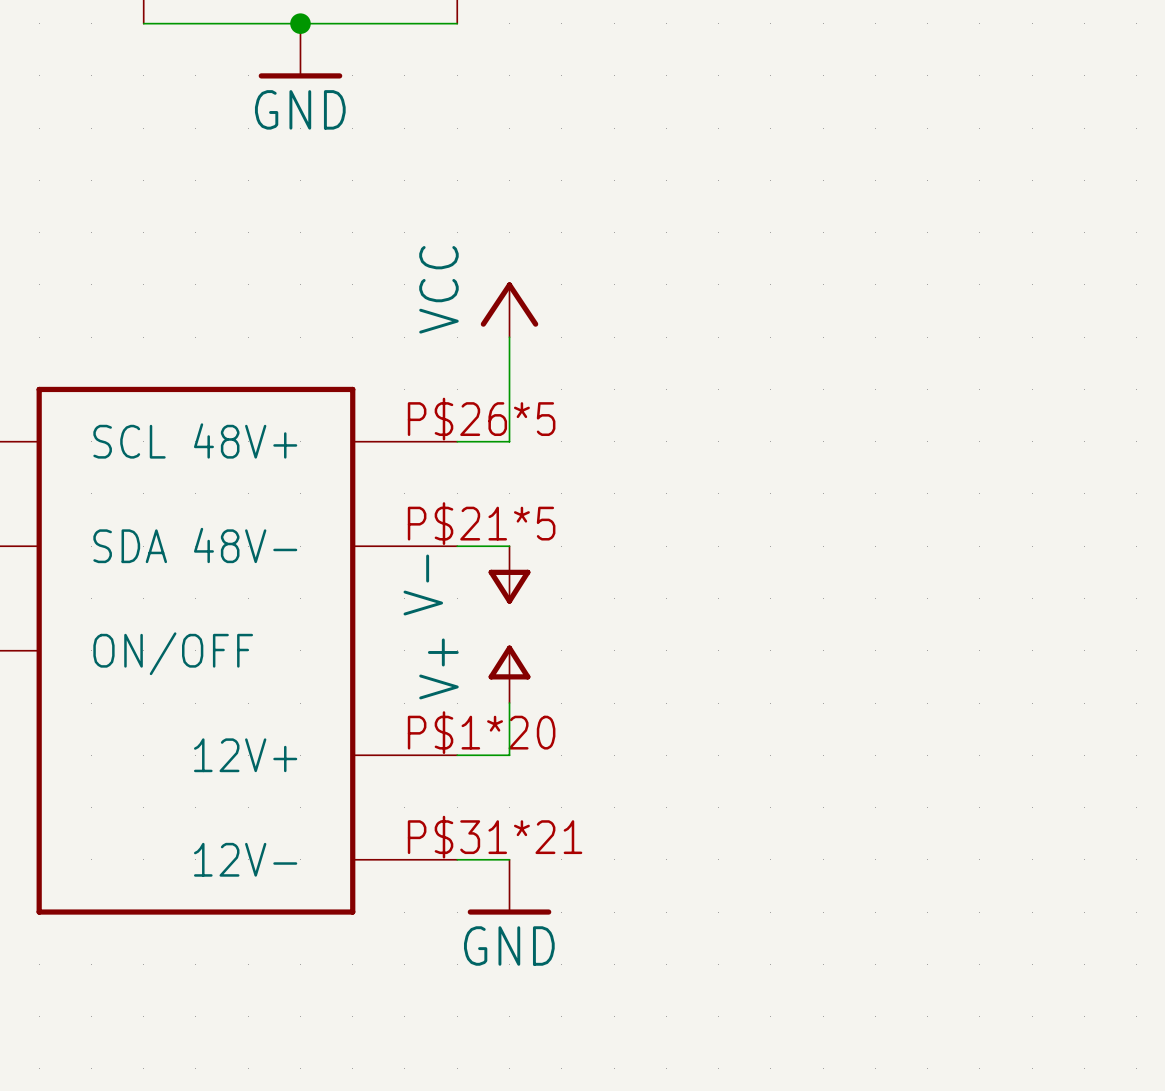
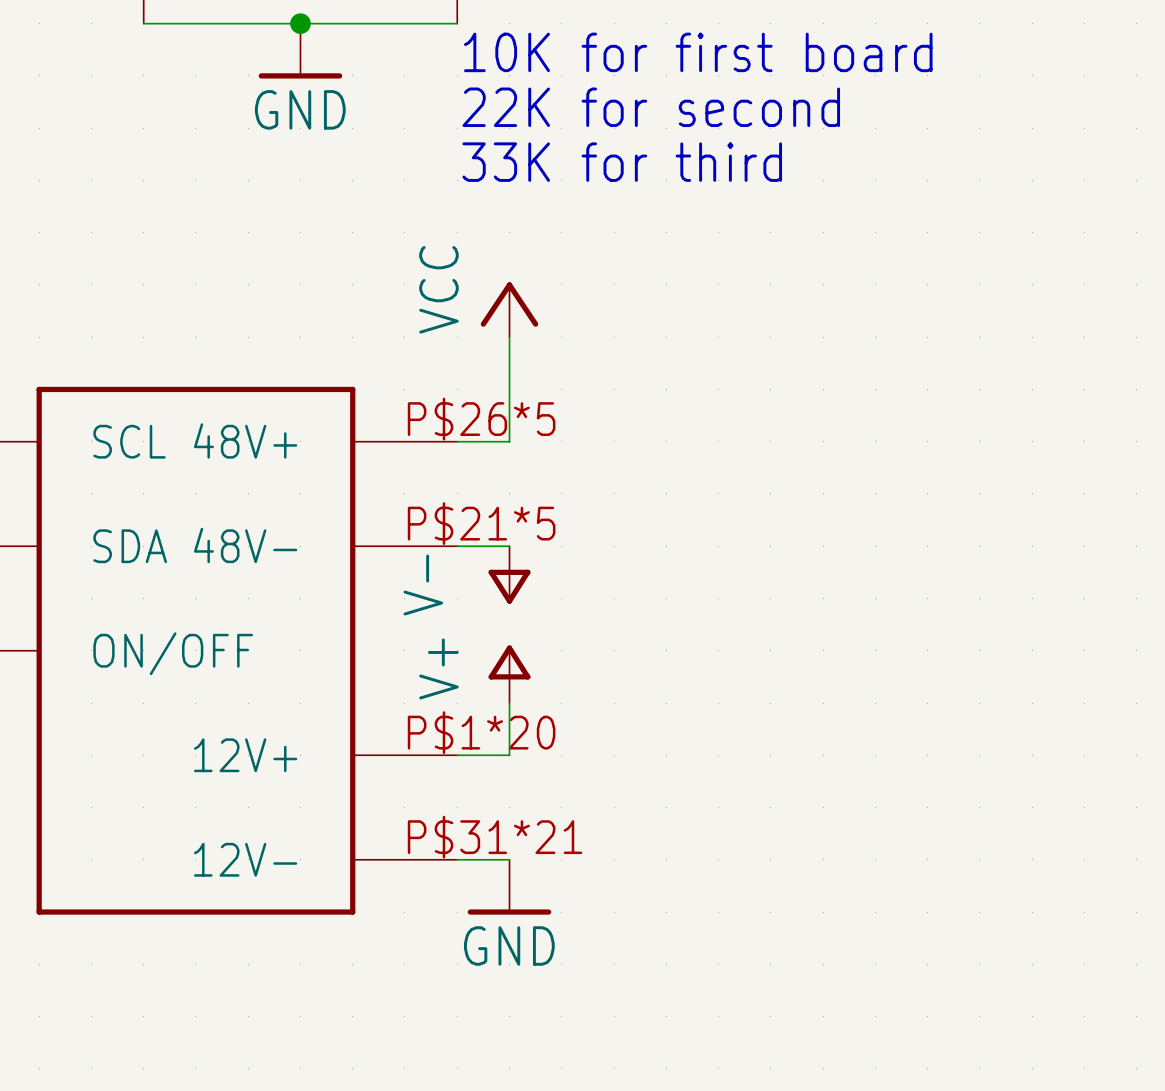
text: none -> 10K for first board (698, 52)
text: none -> 22K for second (651, 107)
text: none -> 33K for third (622, 162)

